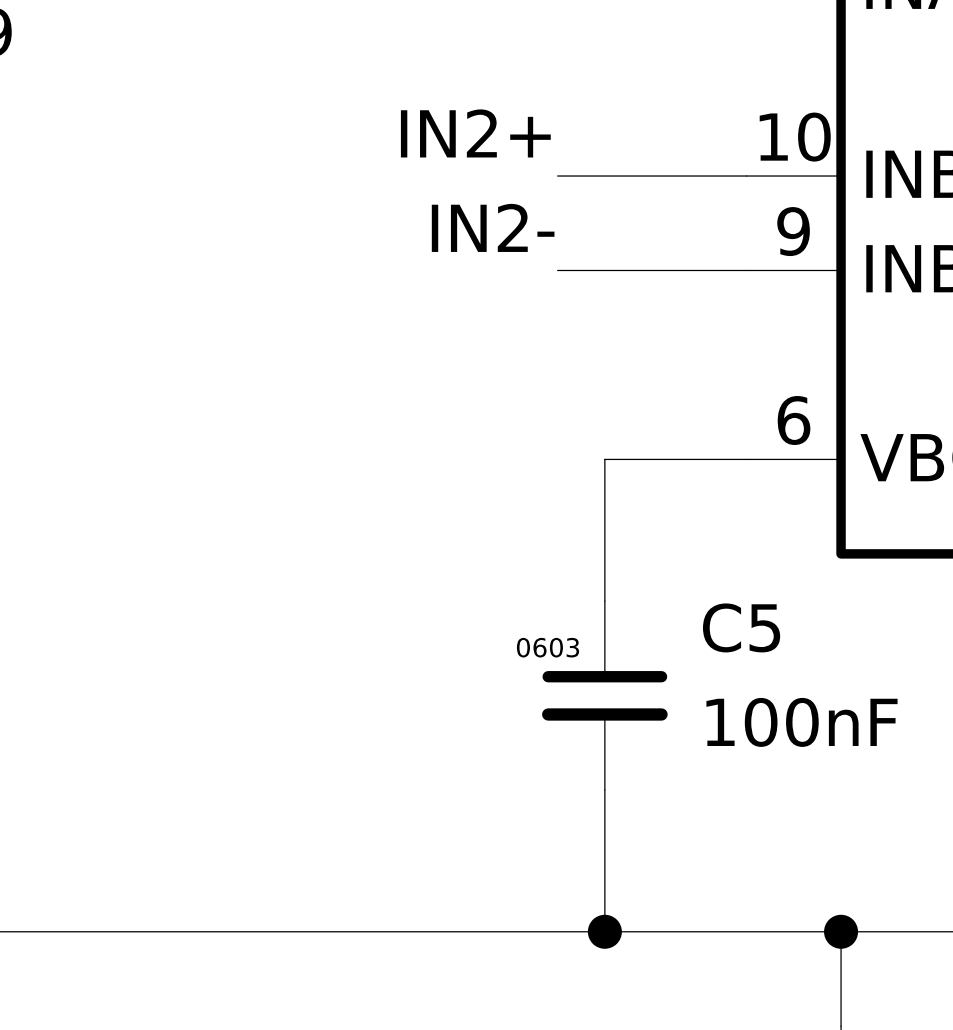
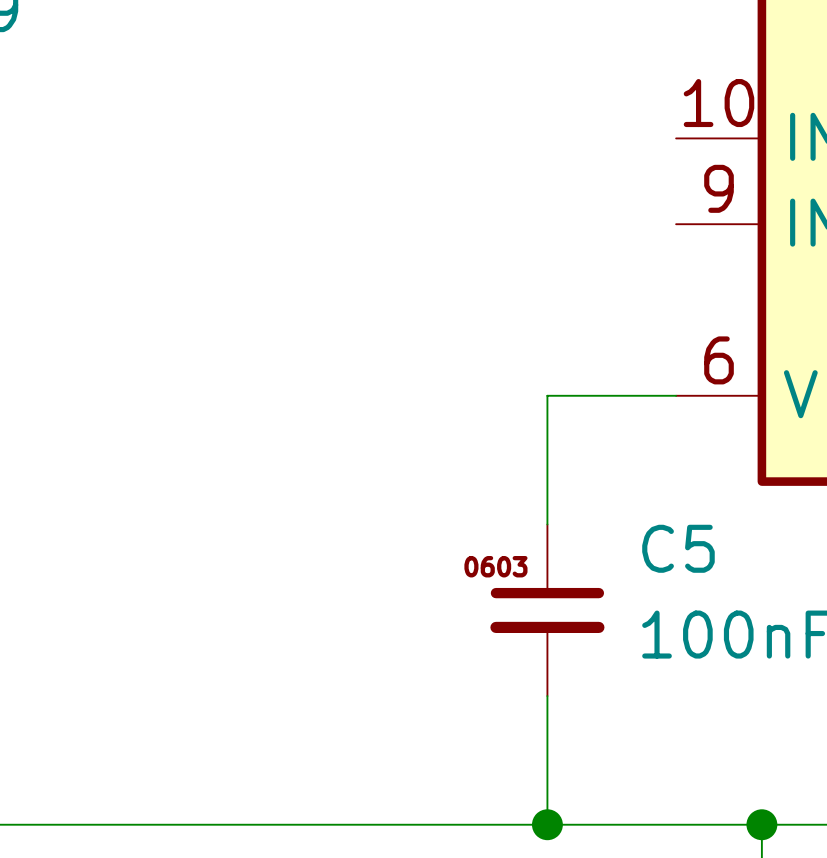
label: IN2+ (475, 133) -> none
wire: (557, 176) (746, 176) -> none
label: IN2- (493, 227) -> none
wire: (557, 270) (746, 270) -> none

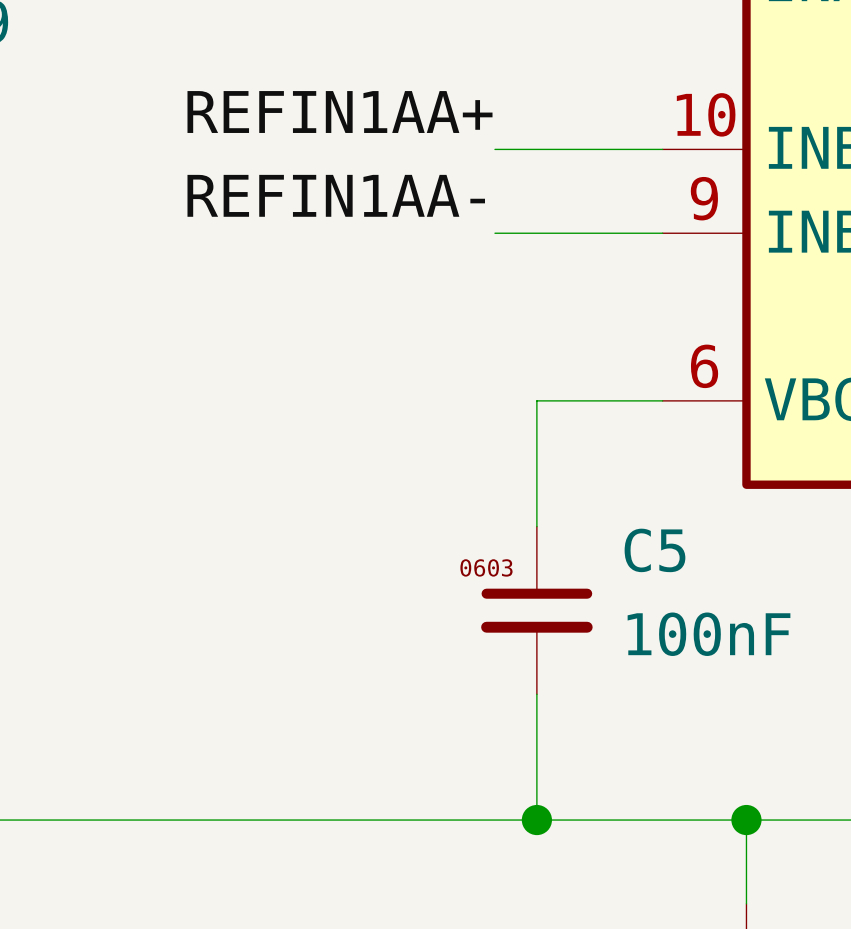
label: none -> REFIN1AA+ (340, 112)
wire: none -> (494, 149) (662, 149)
label: none -> REFIN1AA- (336, 195)
wire: none -> (494, 233) (662, 233)

